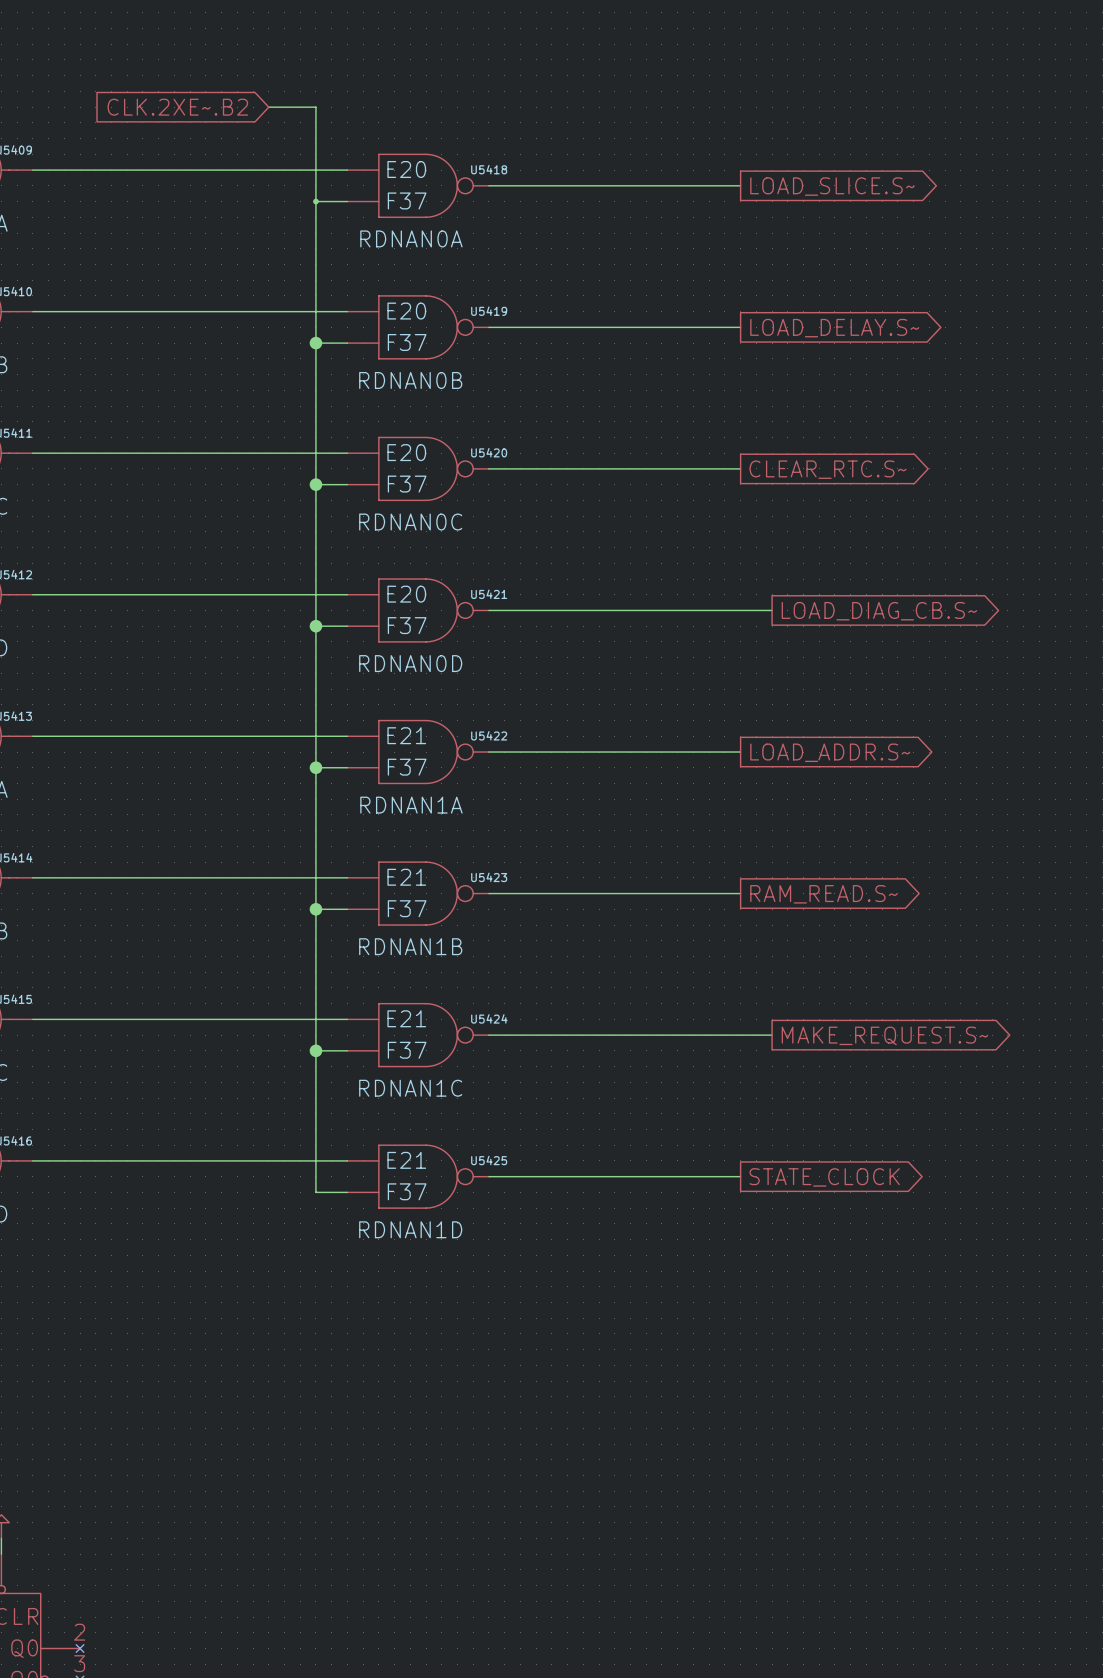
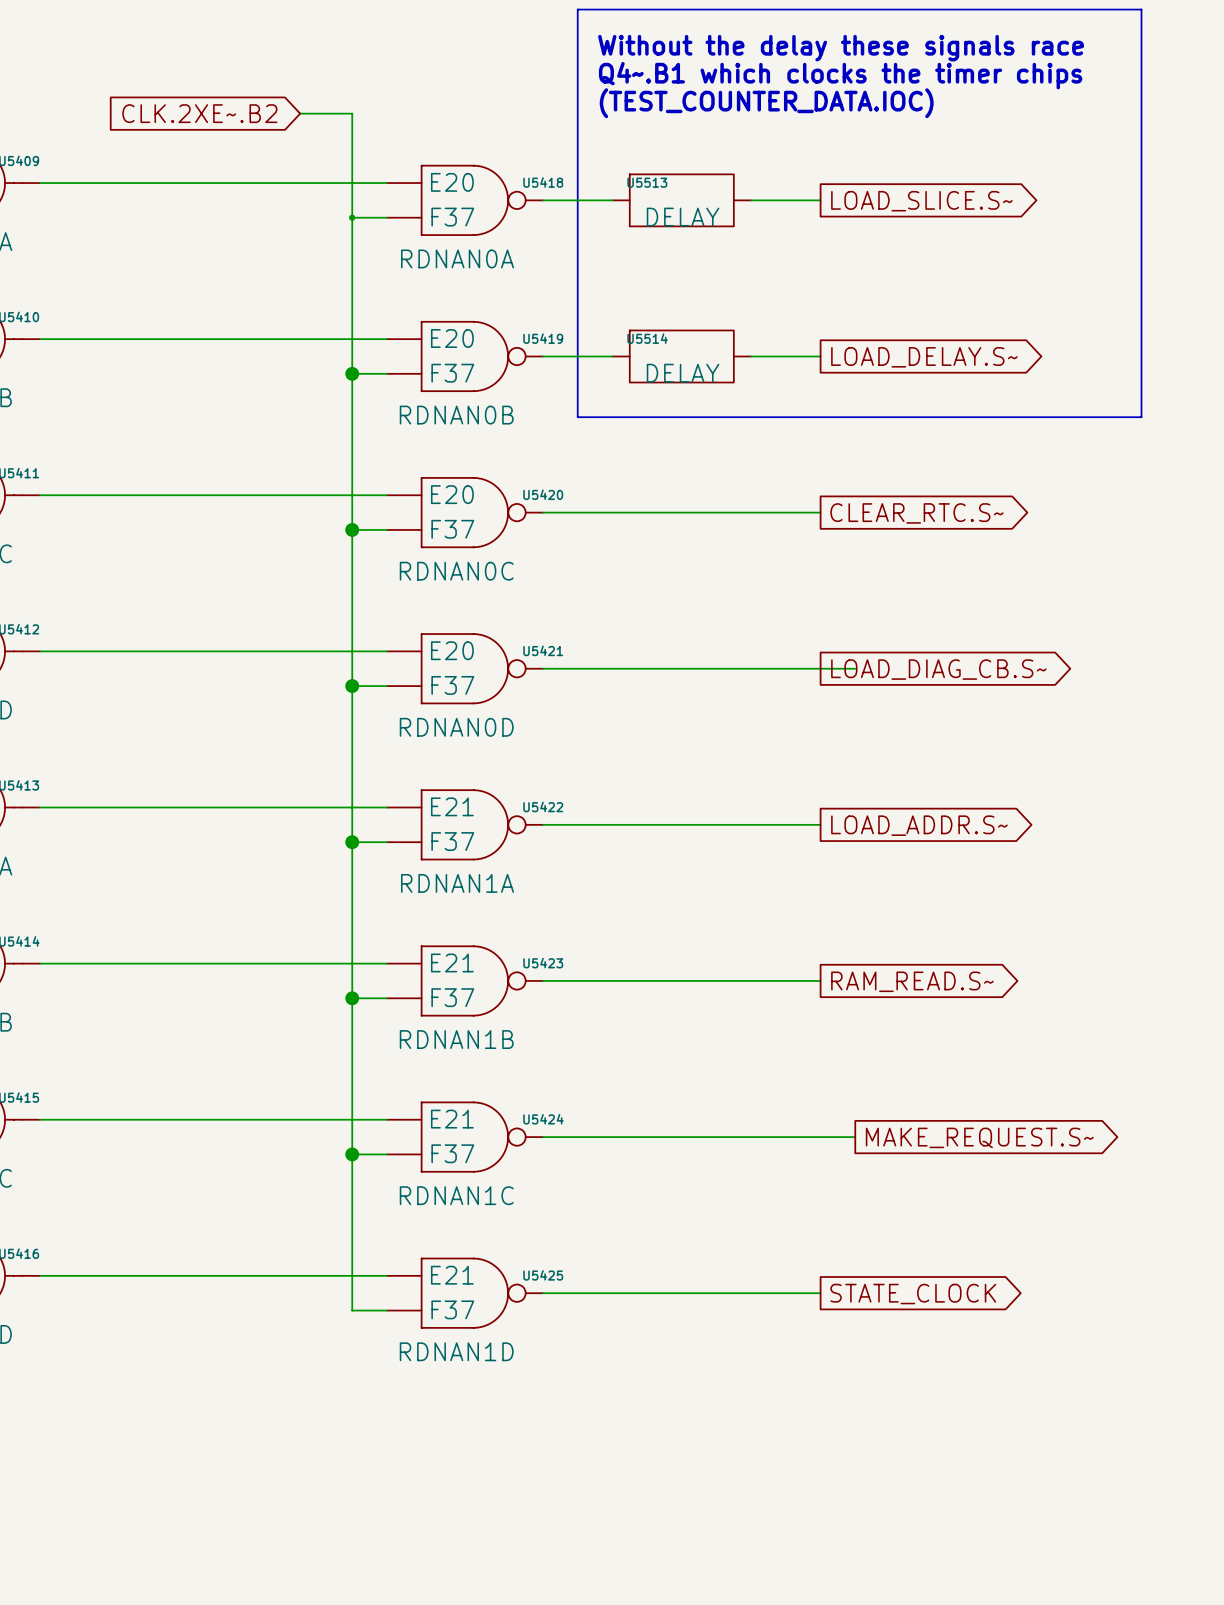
line: none -> (577, 9) (577, 417) (1141, 417) (1141, 9) (577, 9)
text: none -> Without the delay these signals race (841, 48)
text: none -> Q4~.B1 which clocks the timer chips (840, 75)
text: none -> (TEST_COUNTER_DATA.IOC) (766, 103)
wire: (551, 185) (677, 185) -> none
U5513: none -> DELAY (681, 200)
wire: (551, 327) (677, 327) -> none
U5514: none -> DELAY (681, 356)
global label position: LOAD_DIAG_CB.S~ (879, 611) -> LOAD_DIAG_CB.S~ (938, 669)

